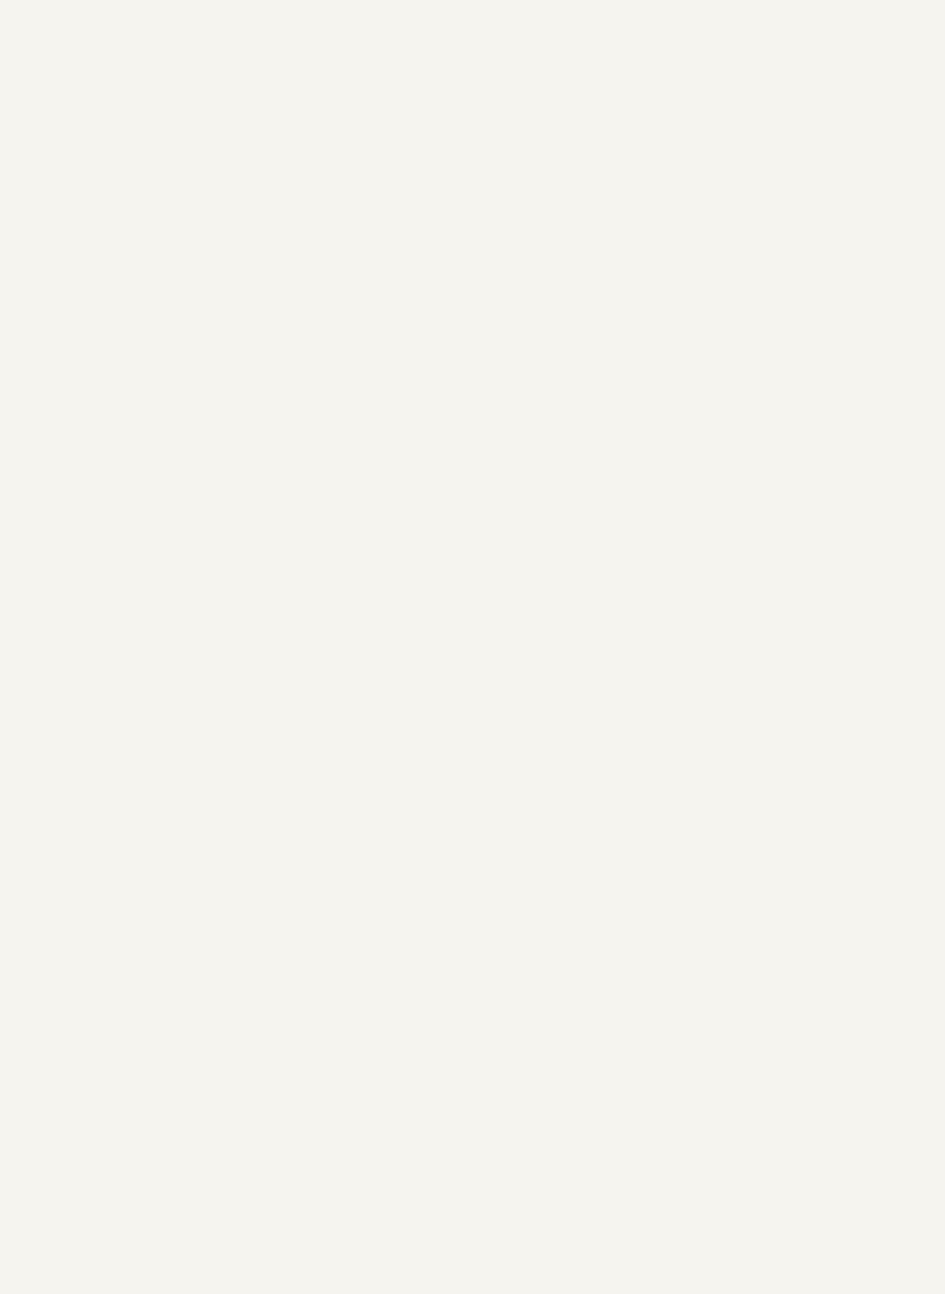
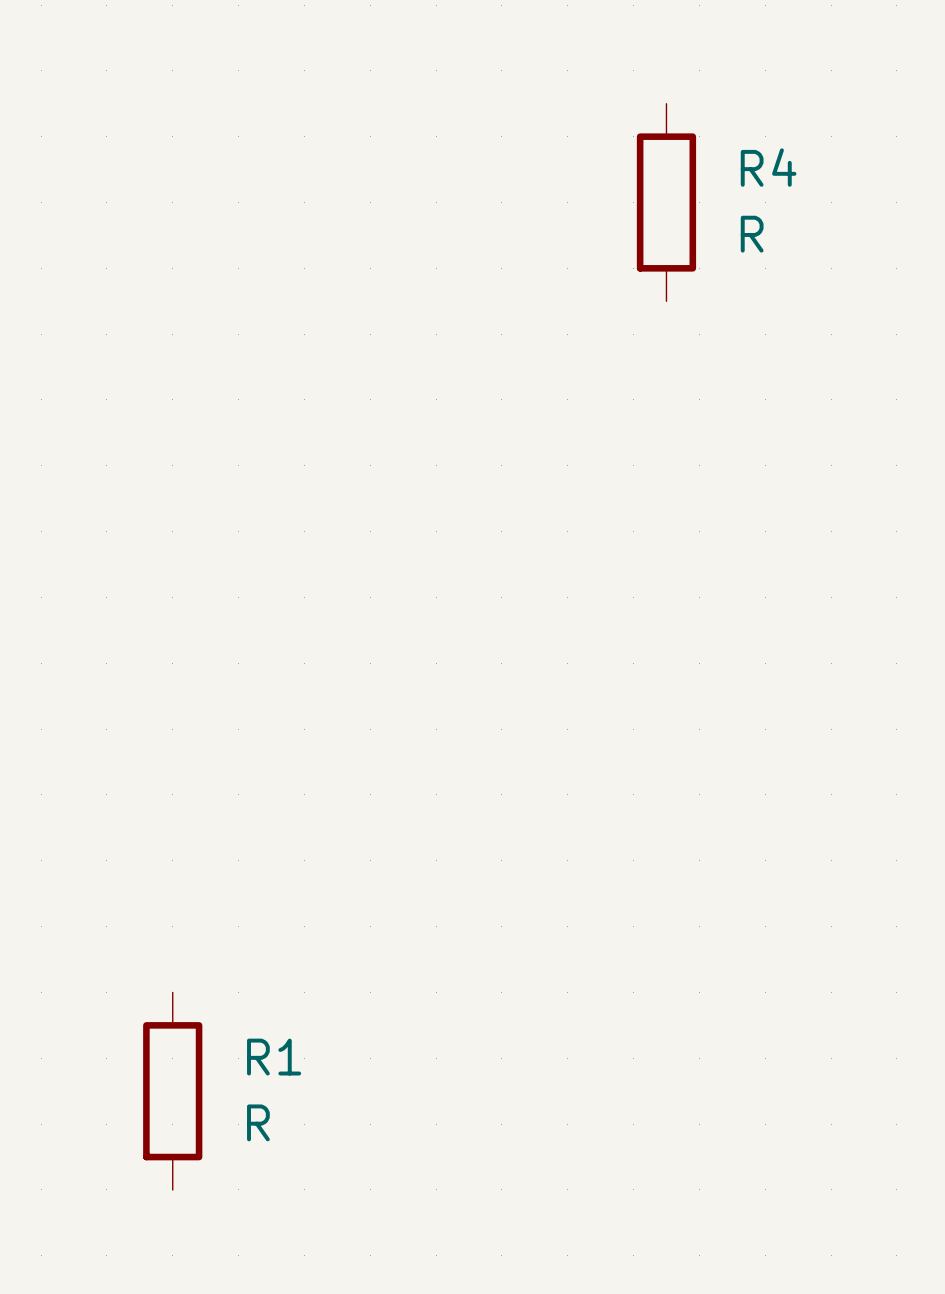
R4: none -> R (666, 202)
R1: none -> R (172, 1091)

